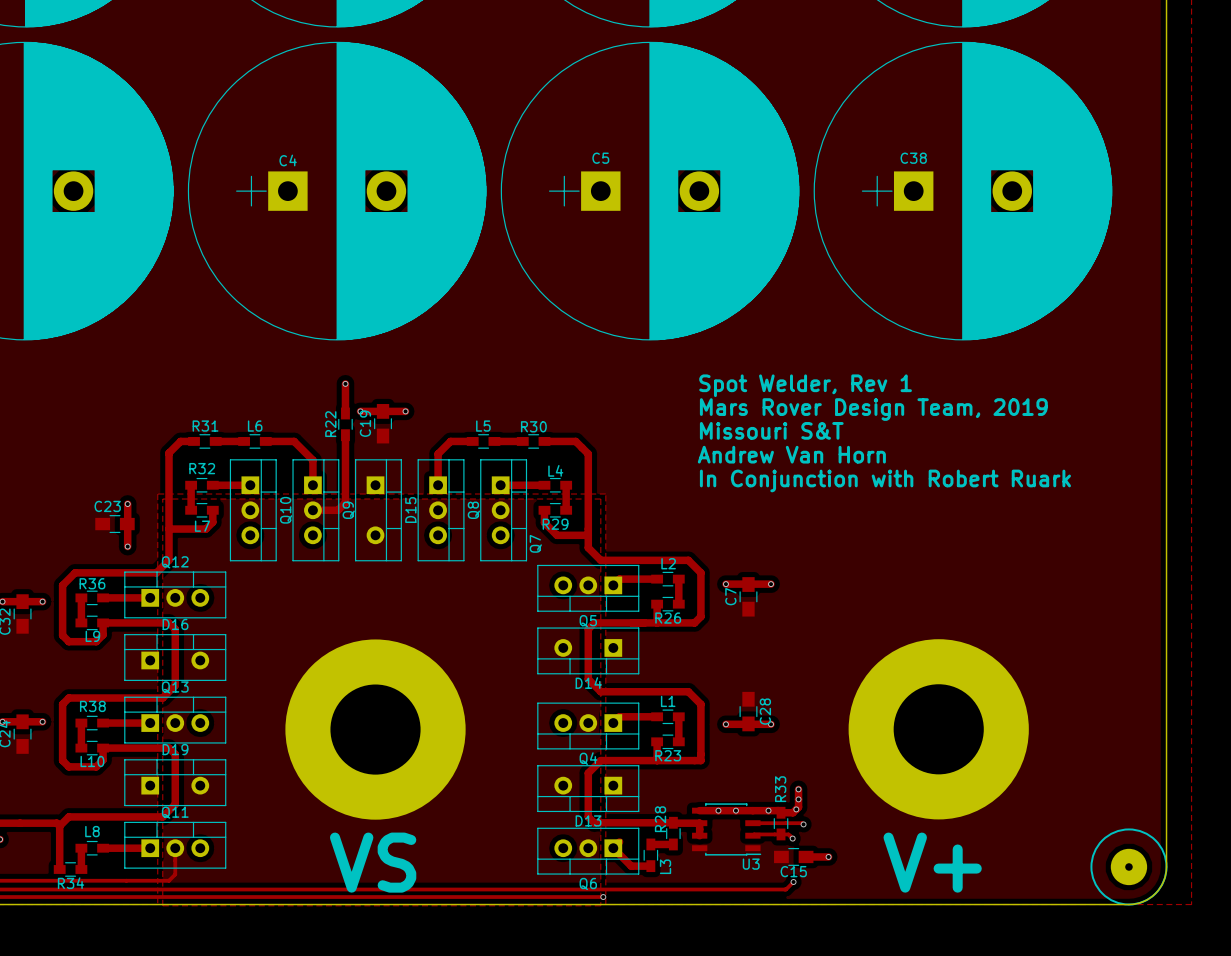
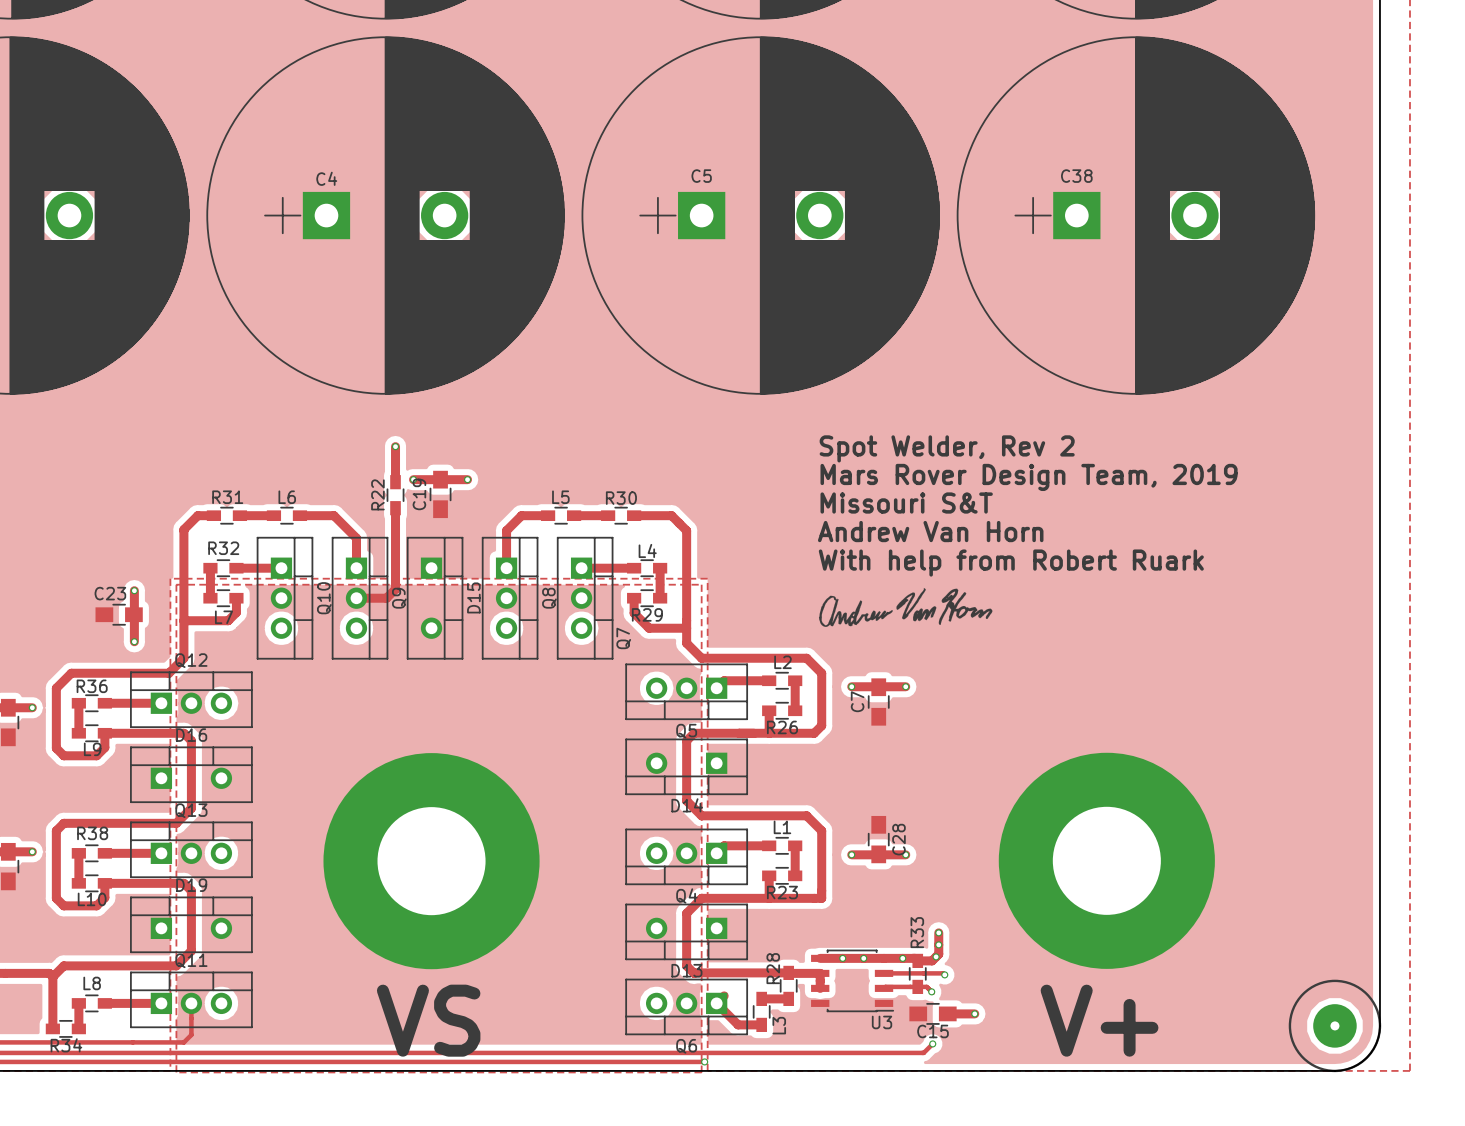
text: Spot Welder, Rev 1 (805, 385) -> Spot Welder, Rev 2 (947, 448)
text: In Conjunction with Robert Ruark (885, 480) -> With help from Robert Ruark (1011, 563)
drawing: none -> [818, 587, 993, 627]

